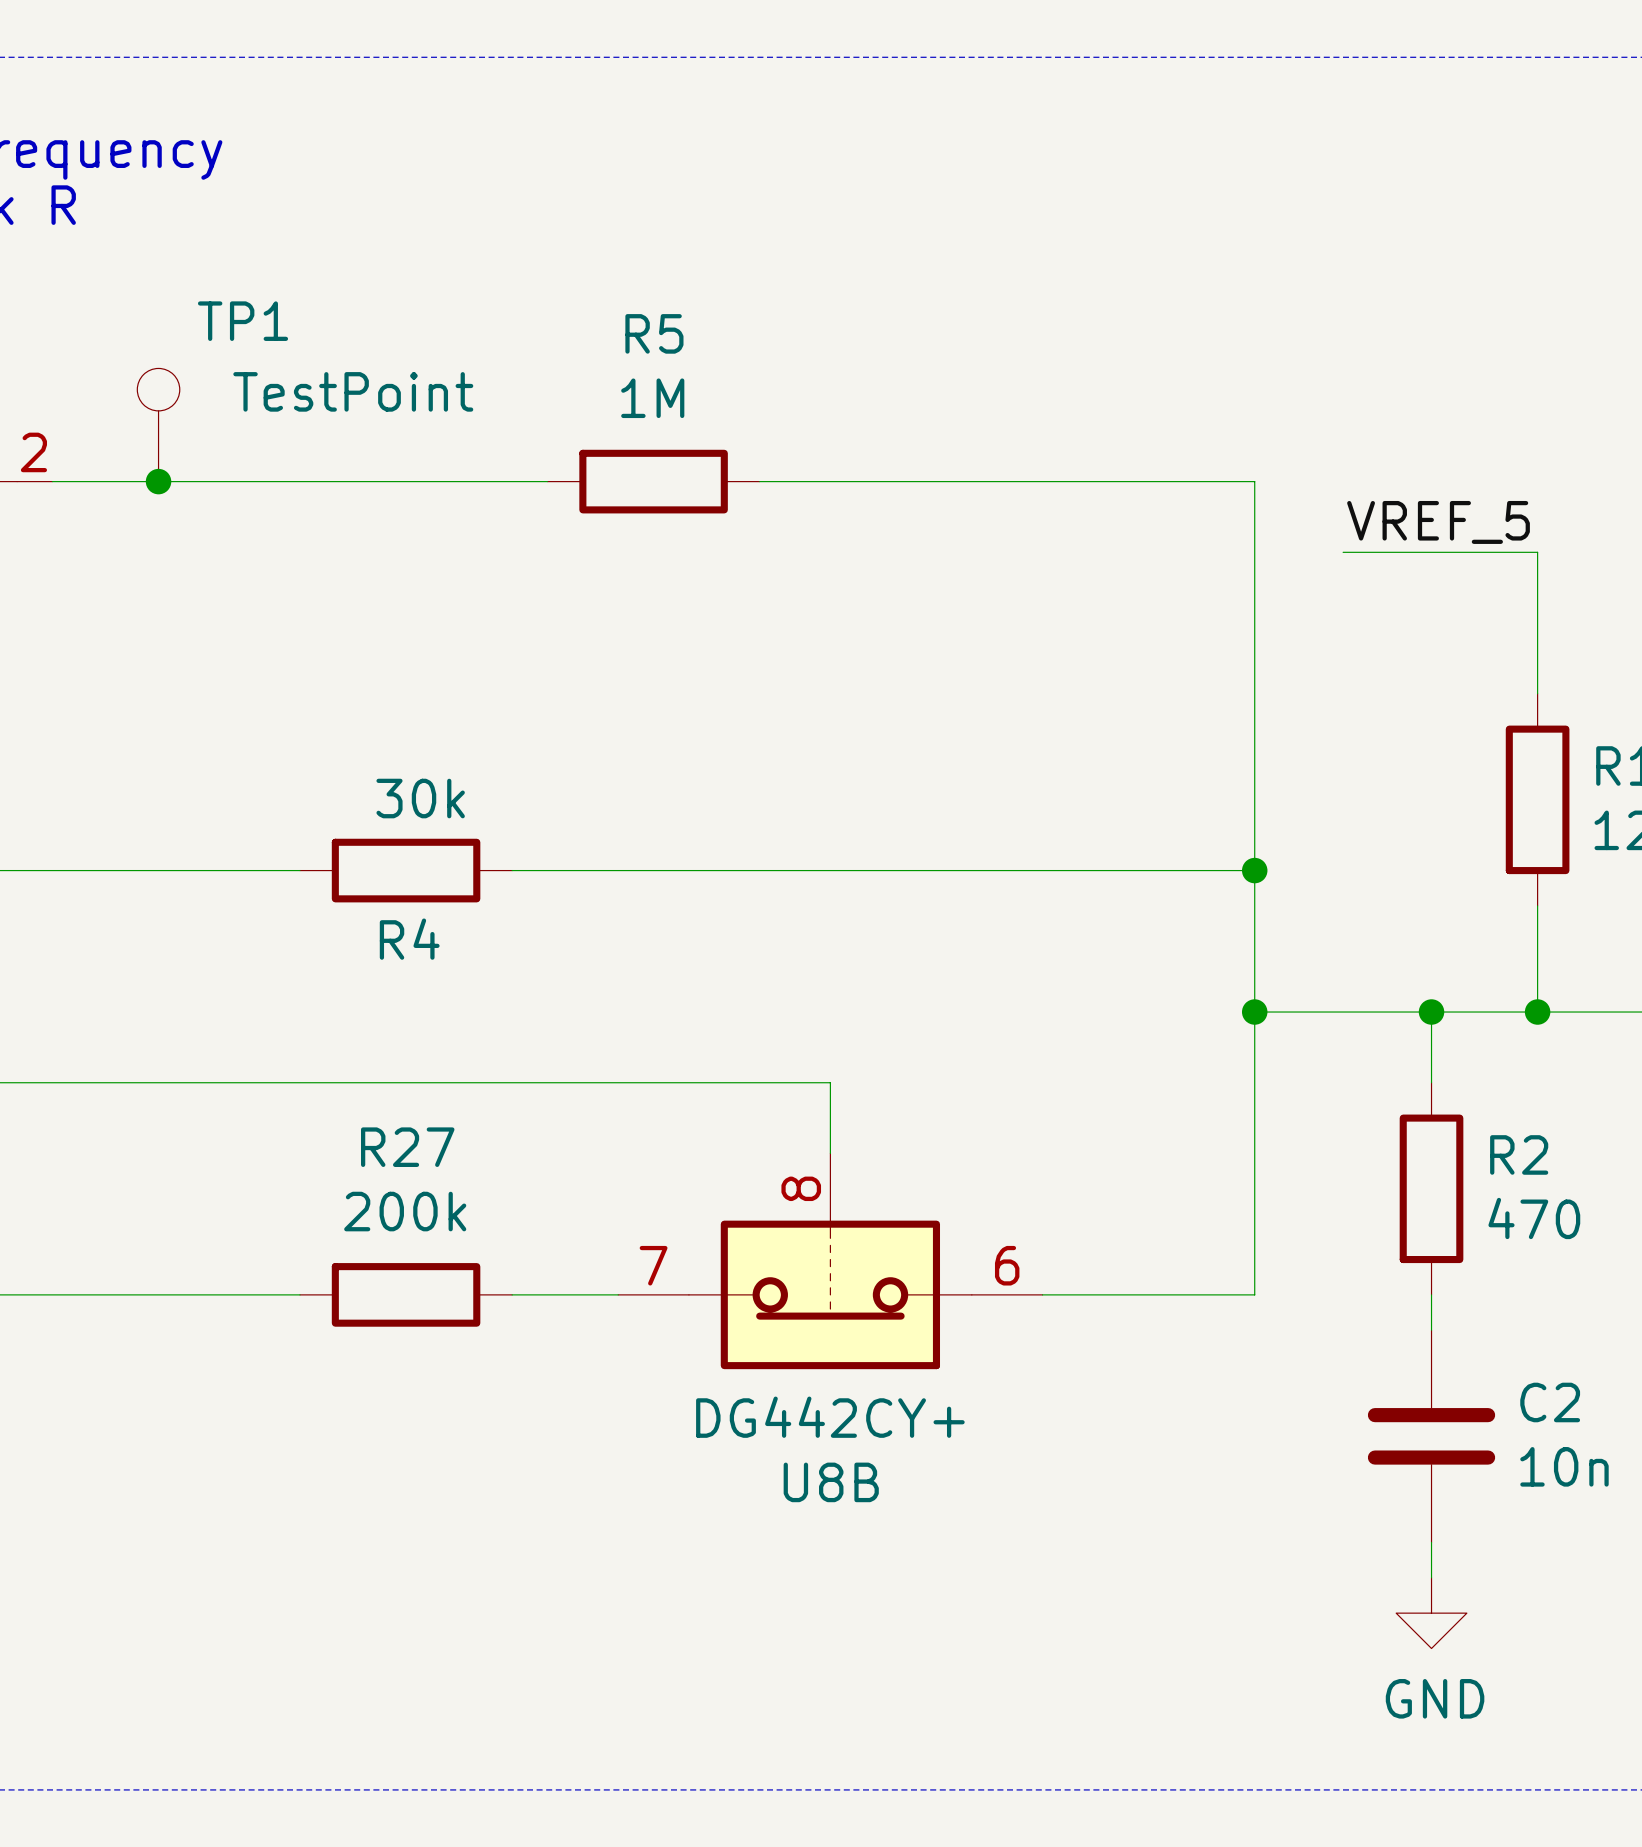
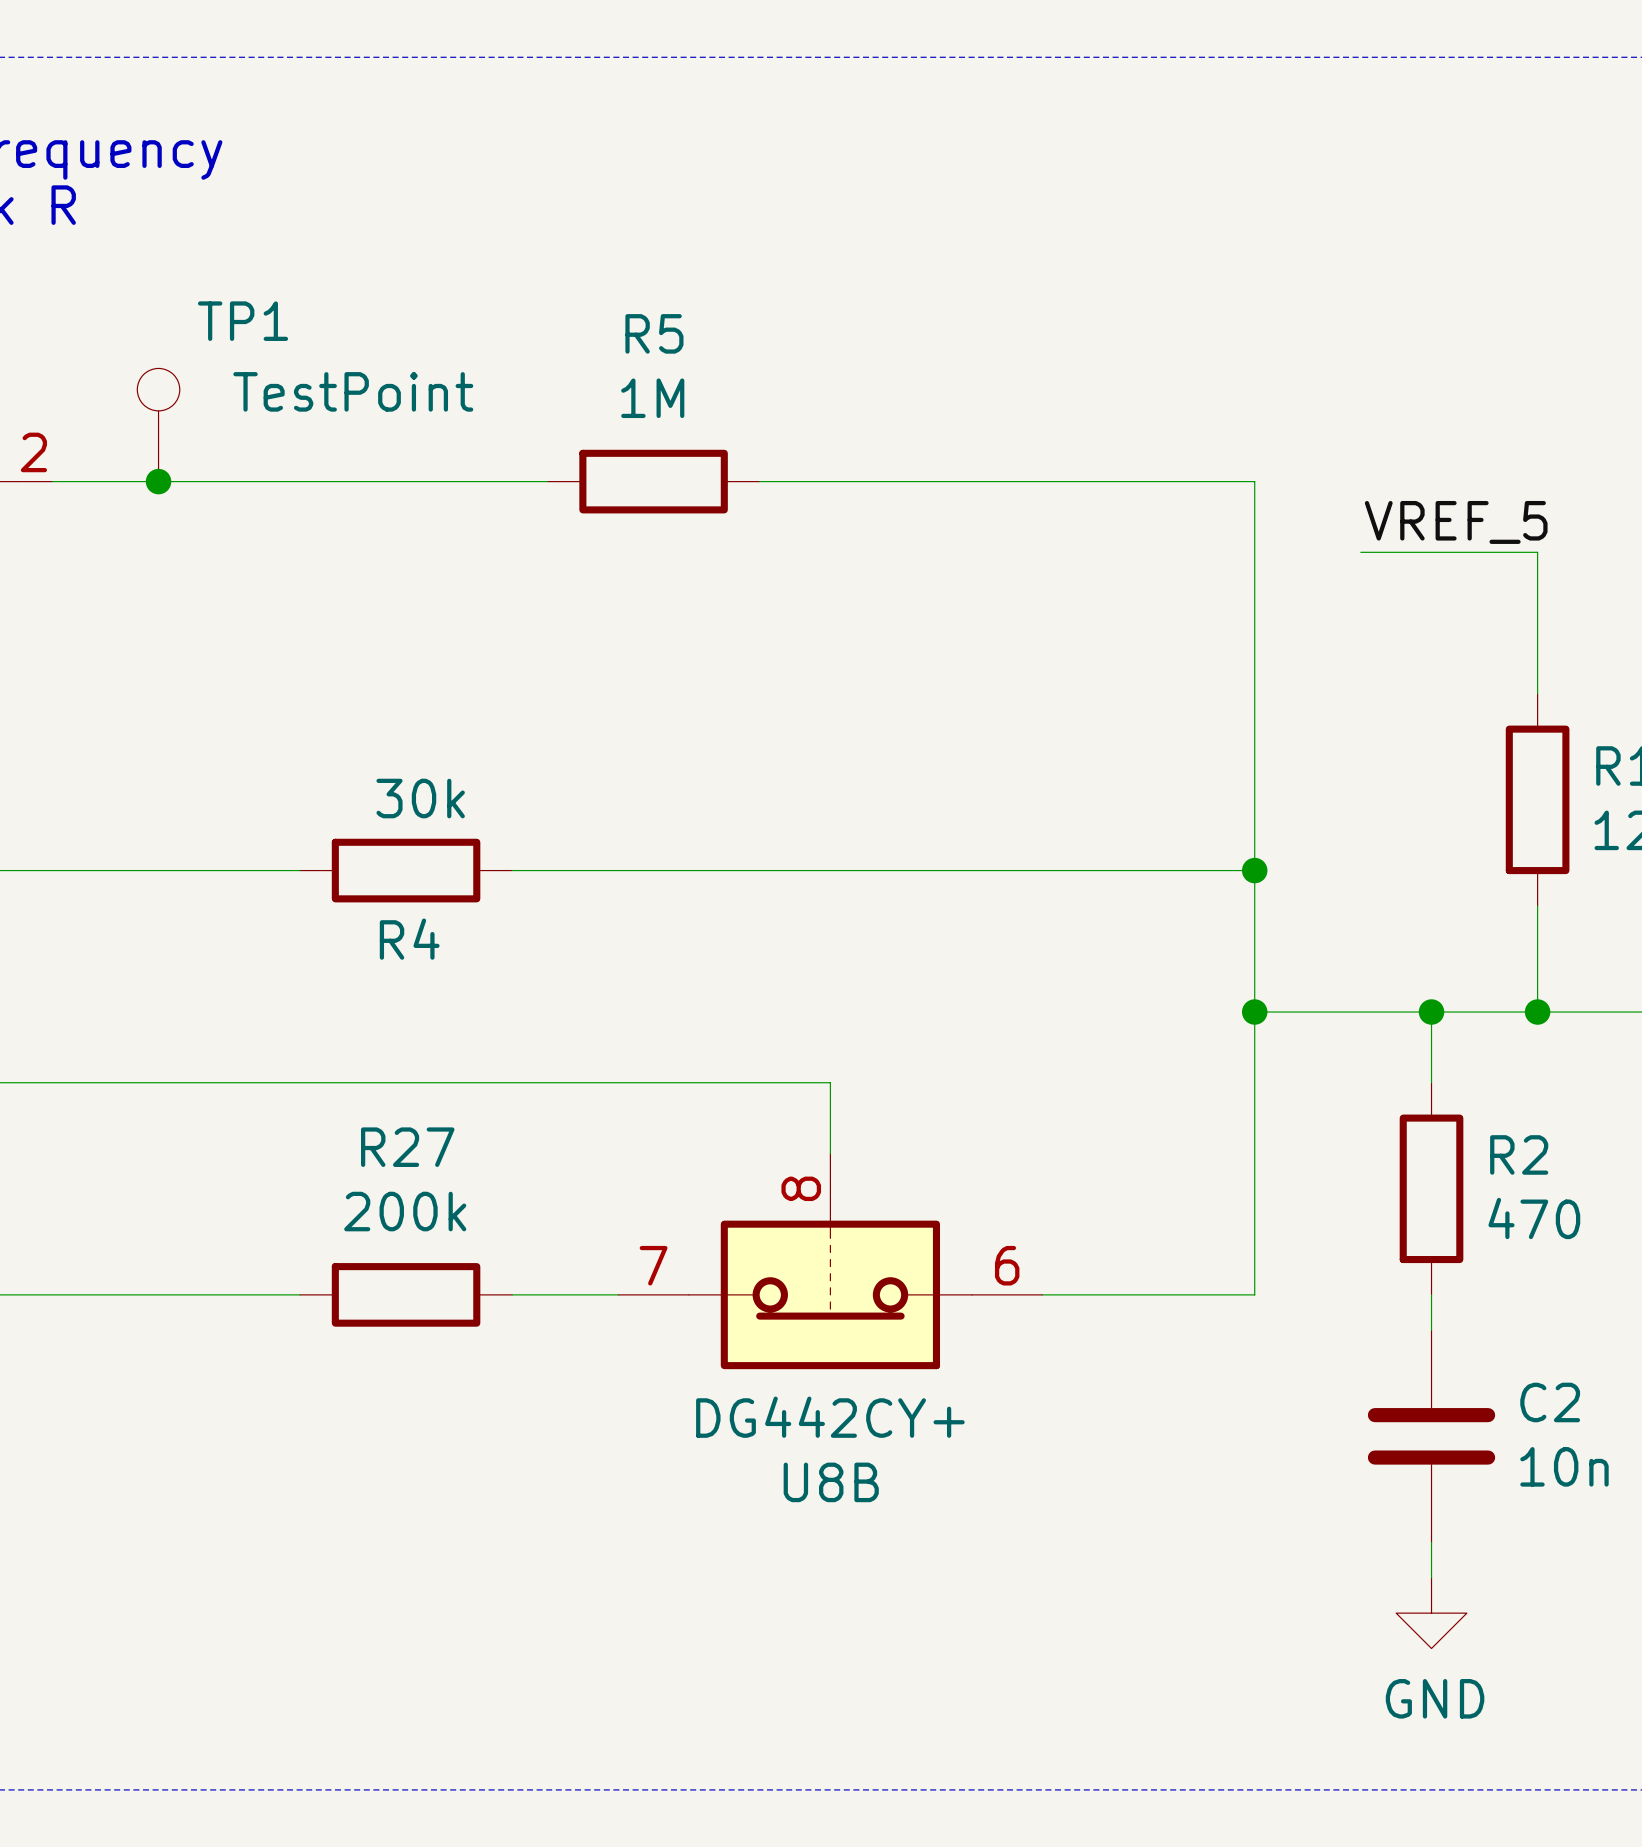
label position: VREF_5 (1438, 522) -> VREF_5 (1456, 522)
wire: (1343, 552) (1360, 552) -> none

